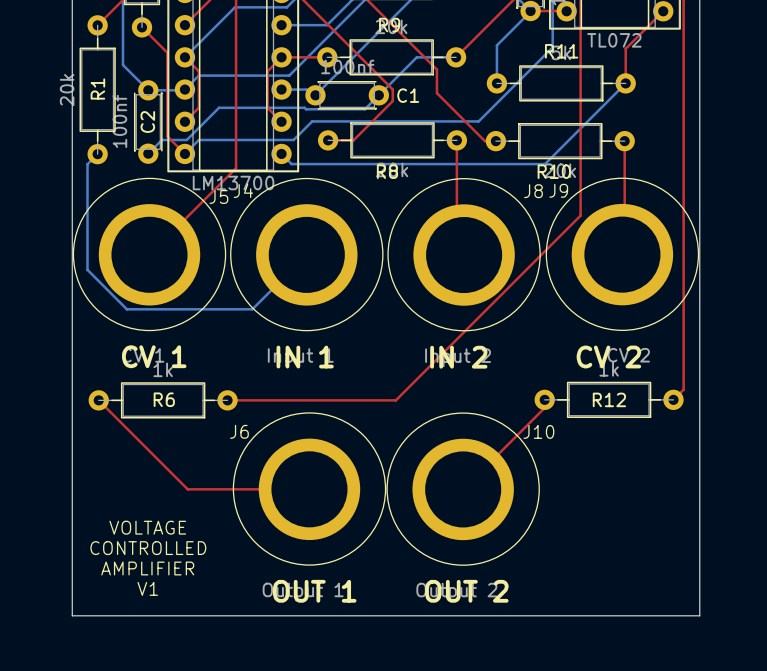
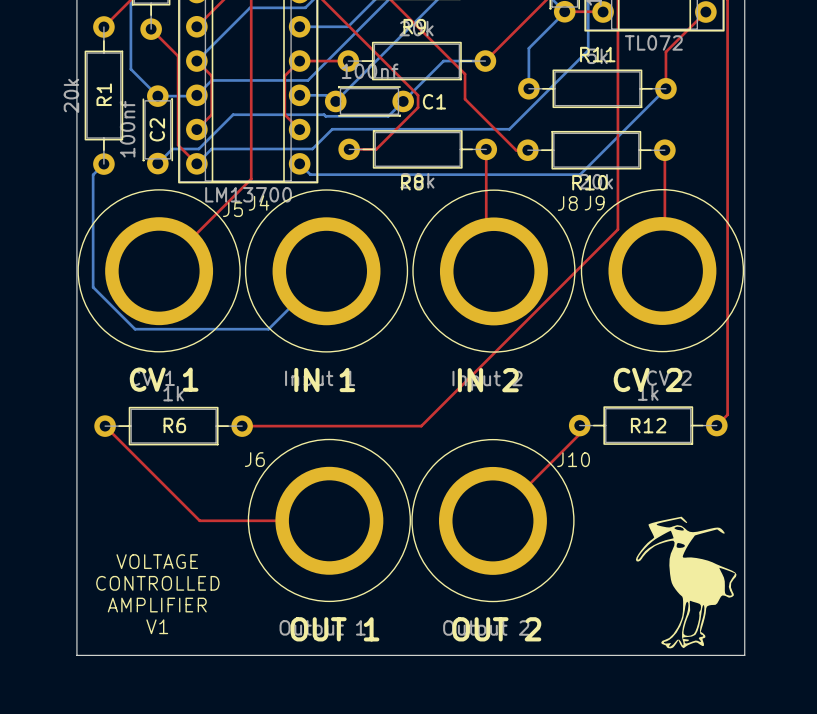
drawing: none -> [635, 516, 737, 649]

